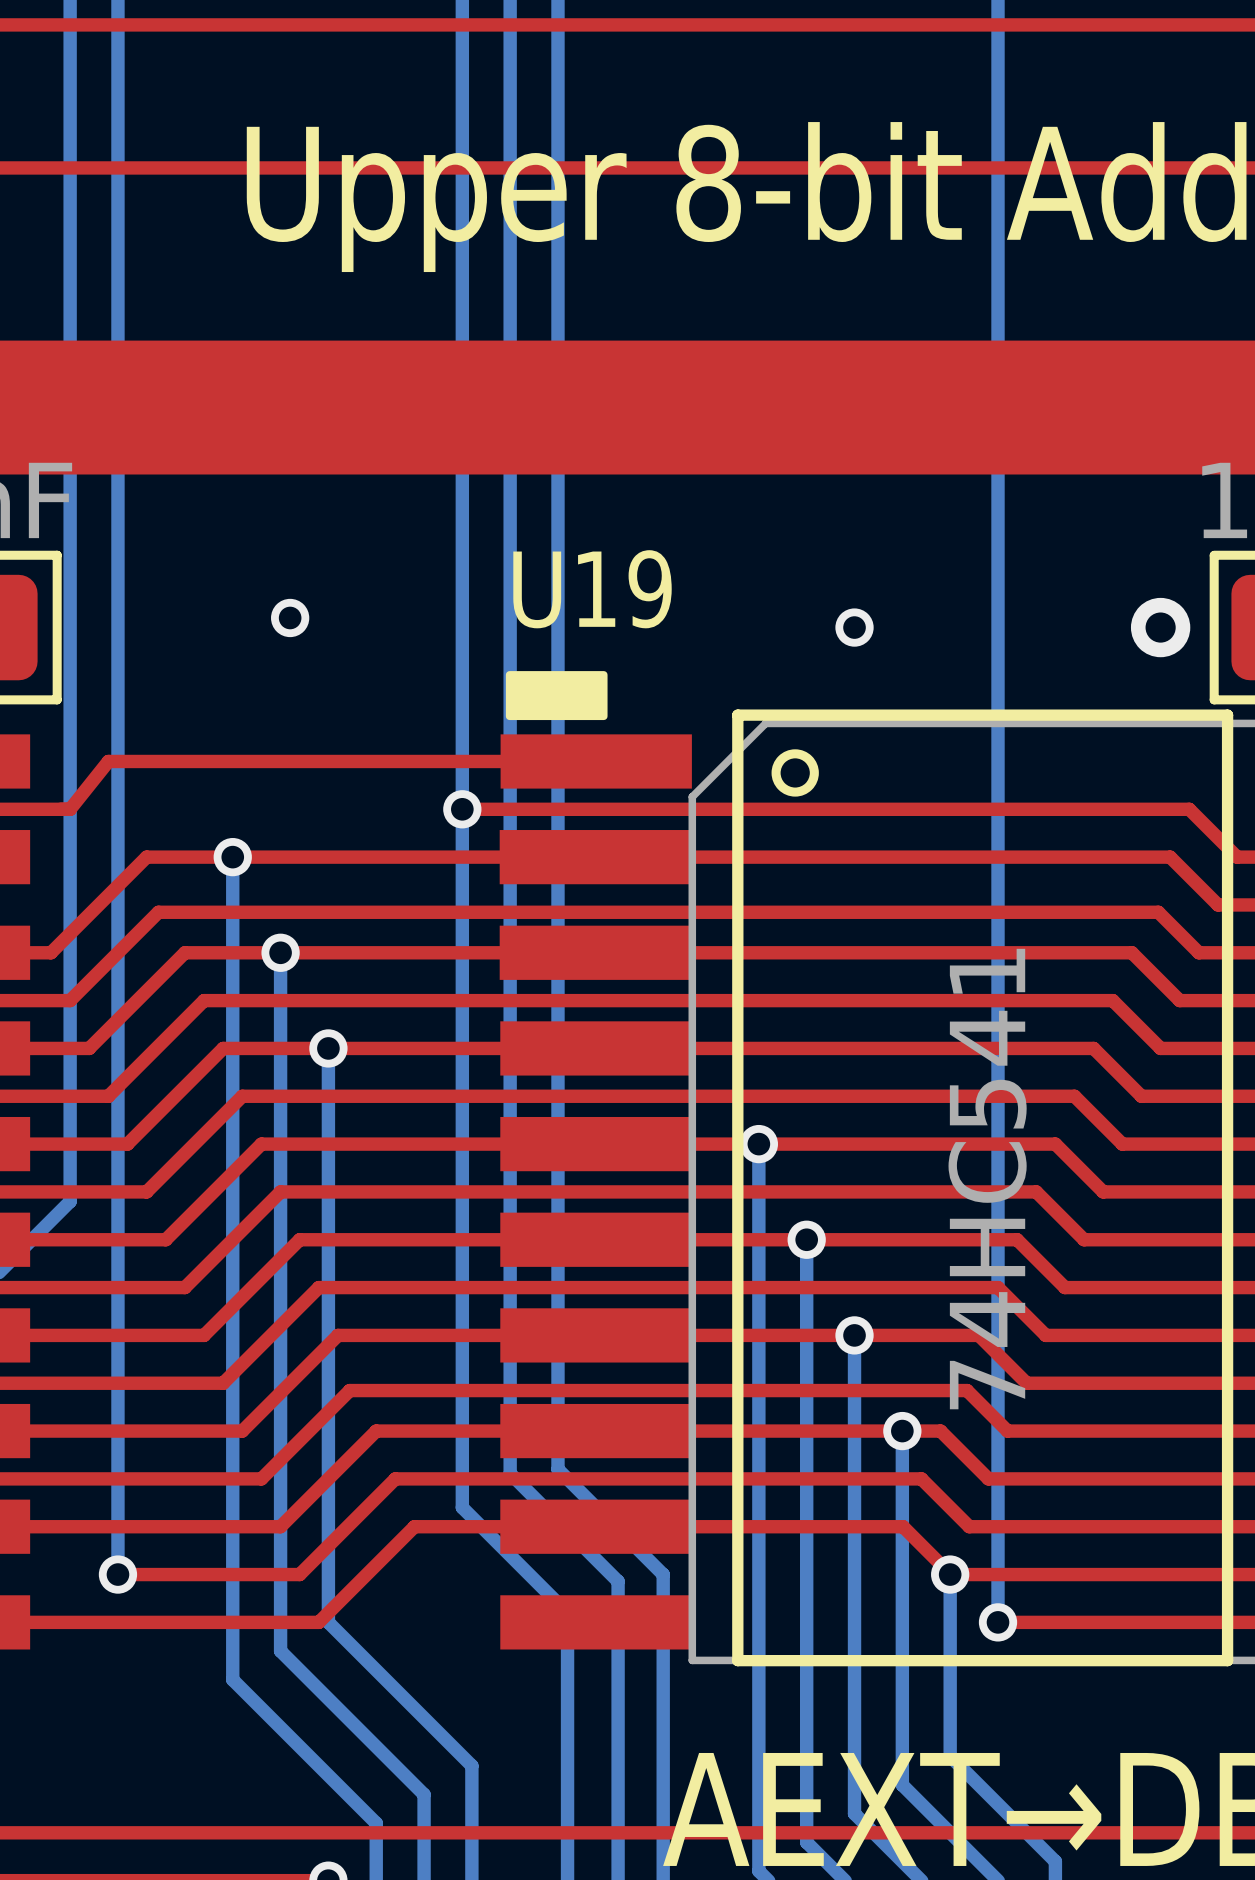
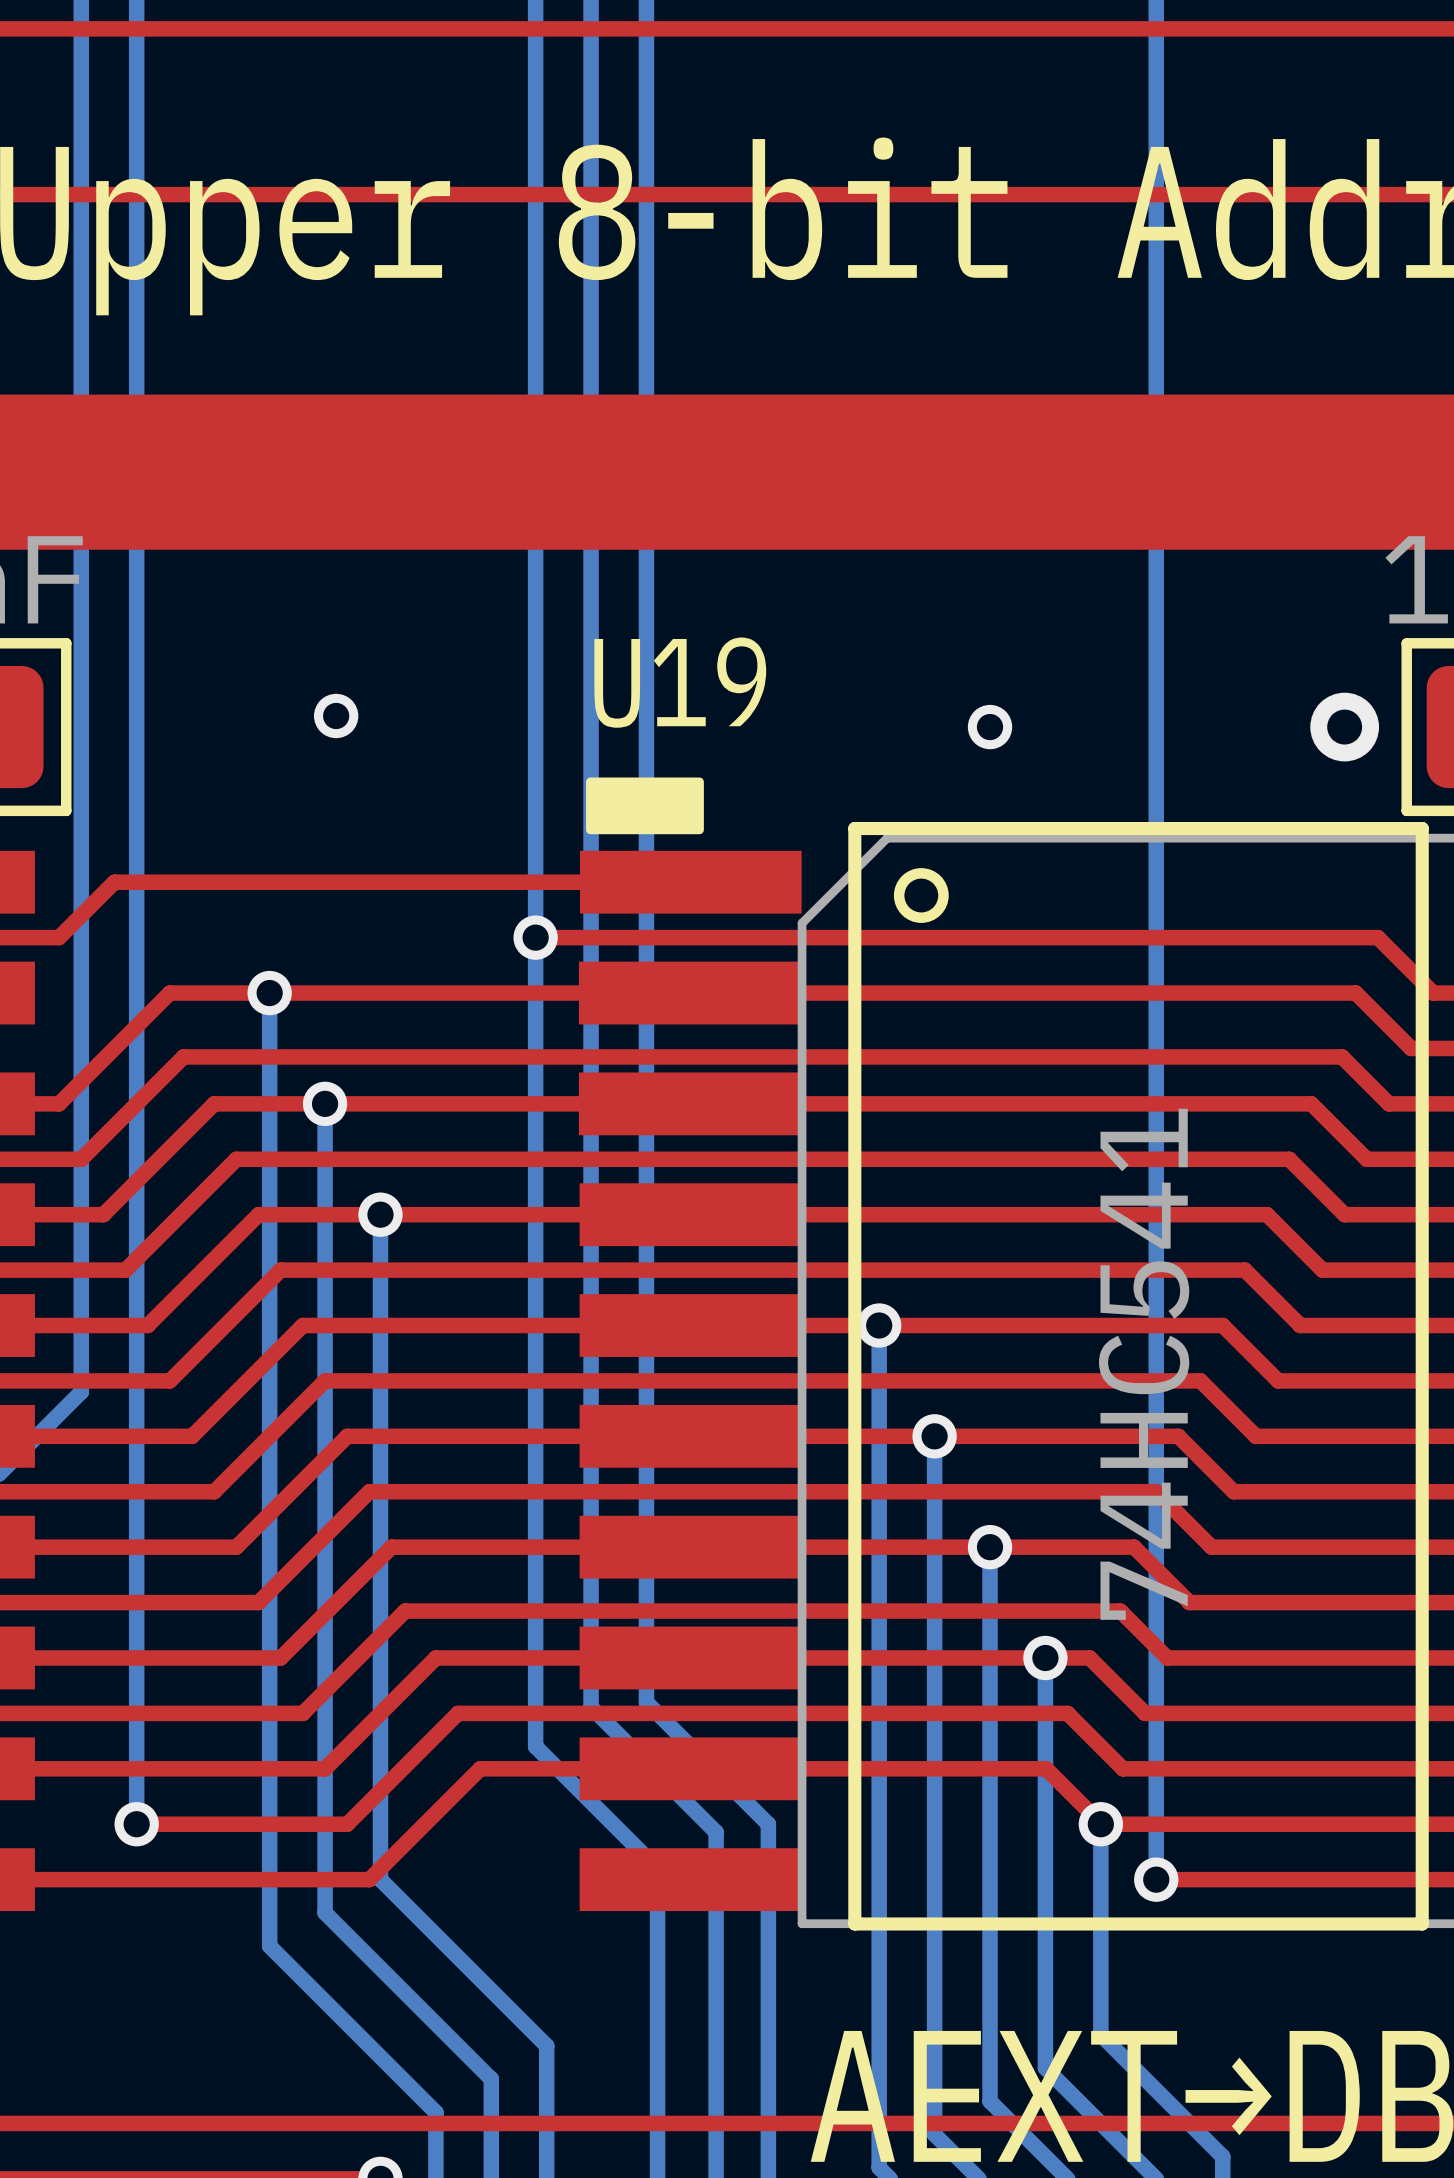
top track: (108, 761) (70, 809) (51, 809) -> (125, 882) (114, 882) (59, 937)

